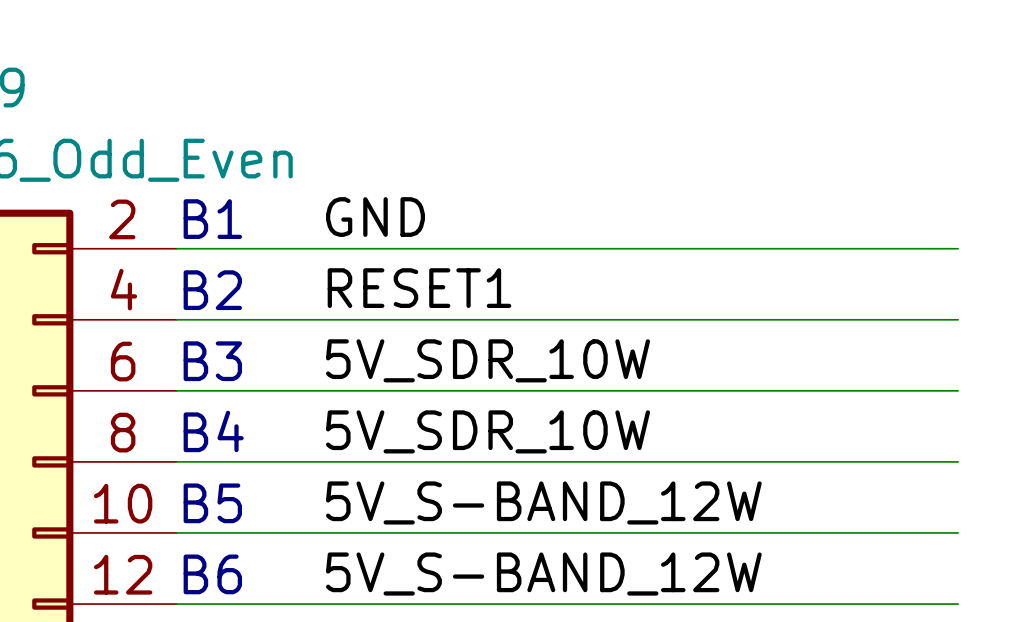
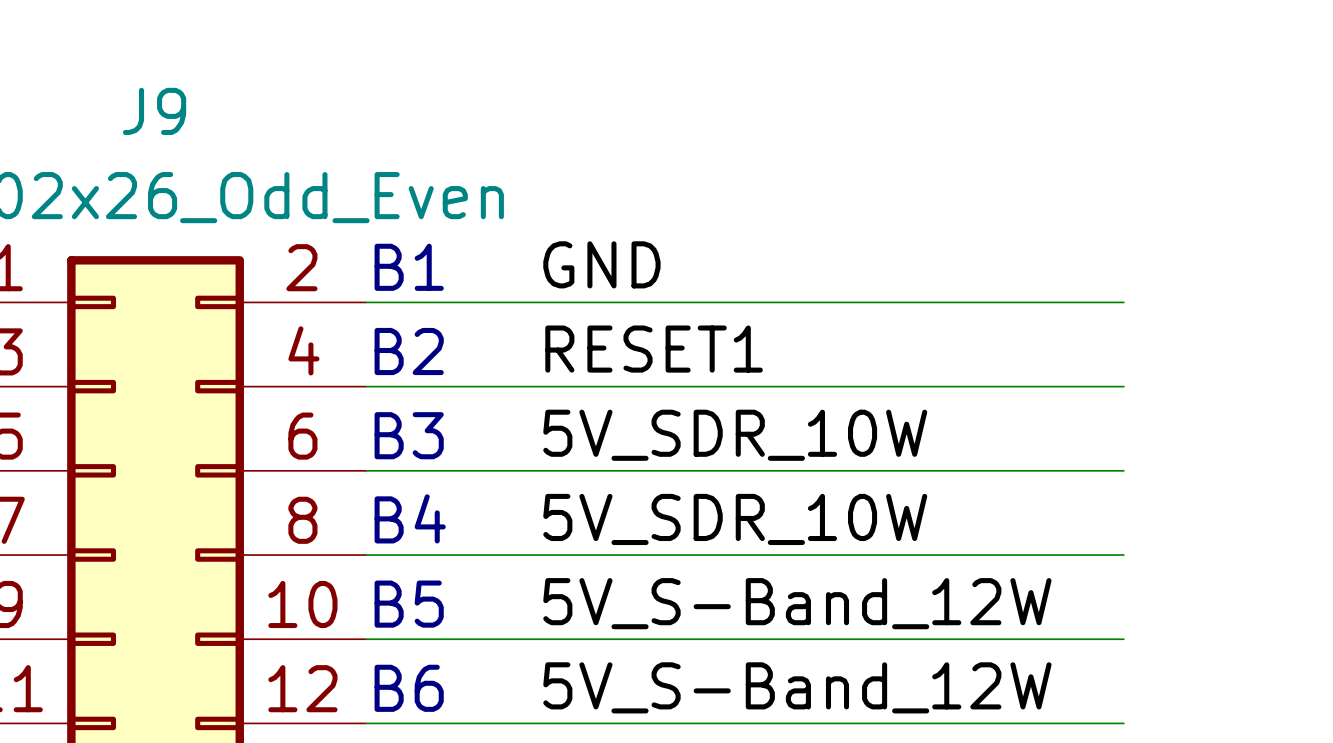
wire: (815, 248) (958, 248) -> none
wire: (815, 319) (958, 319) -> none
wire: (815, 390) (958, 390) -> none
wire: (815, 461) (958, 461) -> none
label: 5V_S-BAND_12W (543, 502) -> 5V_S-Band_12W (797, 603)
wire: (815, 532) (958, 532) -> none
label: 5V_S-BAND_12W (543, 574) -> 5V_S-Band_12W (797, 687)
wire: (815, 604) (958, 604) -> none

